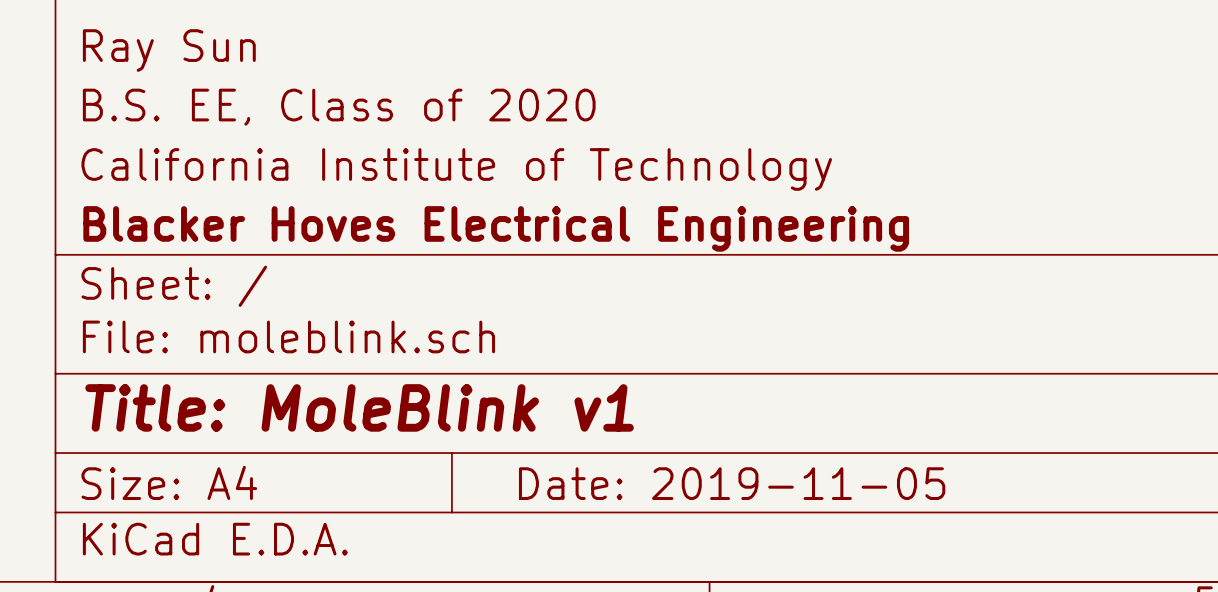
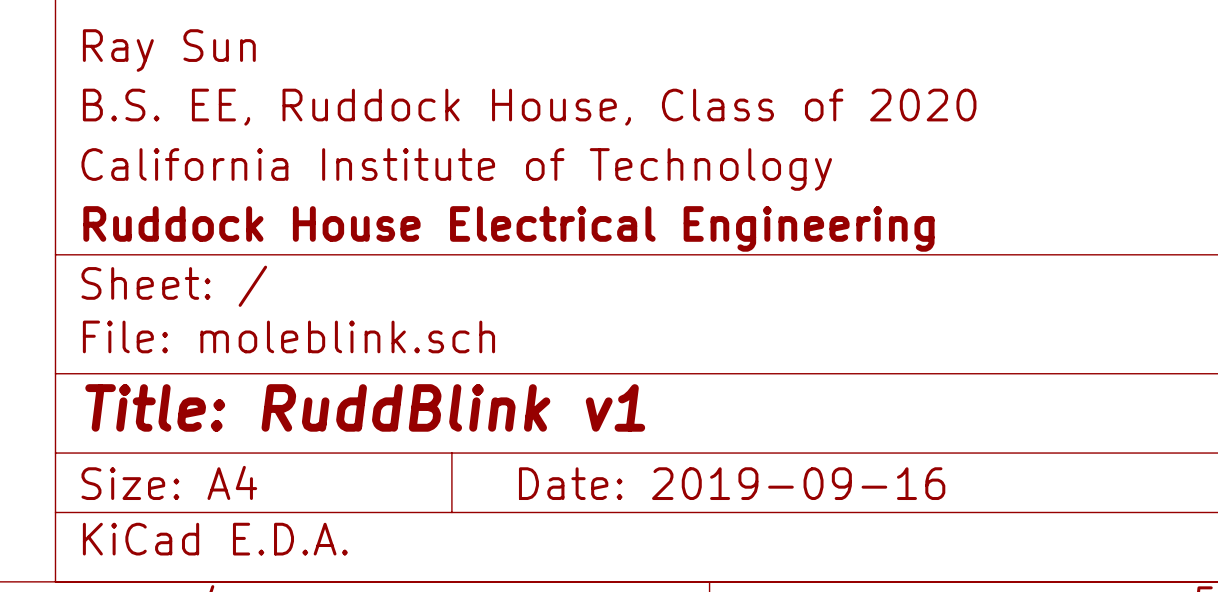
title block: B.S. EE, Class of 2020 (339, 107) -> B.S. EE, Ruddock House, Class of 2020 (529, 107)
title block: Blacker Hoves Electrical Engineering (496, 228) -> Ruddock House Electrical Engineering (508, 228)
title block: Title: MoleBlink v1 (359, 407) -> Title: RuddBlink v1 (365, 407)
title block: Date: 2019-11-05 (732, 483) -> Date: 2019-09-16 (732, 483)

